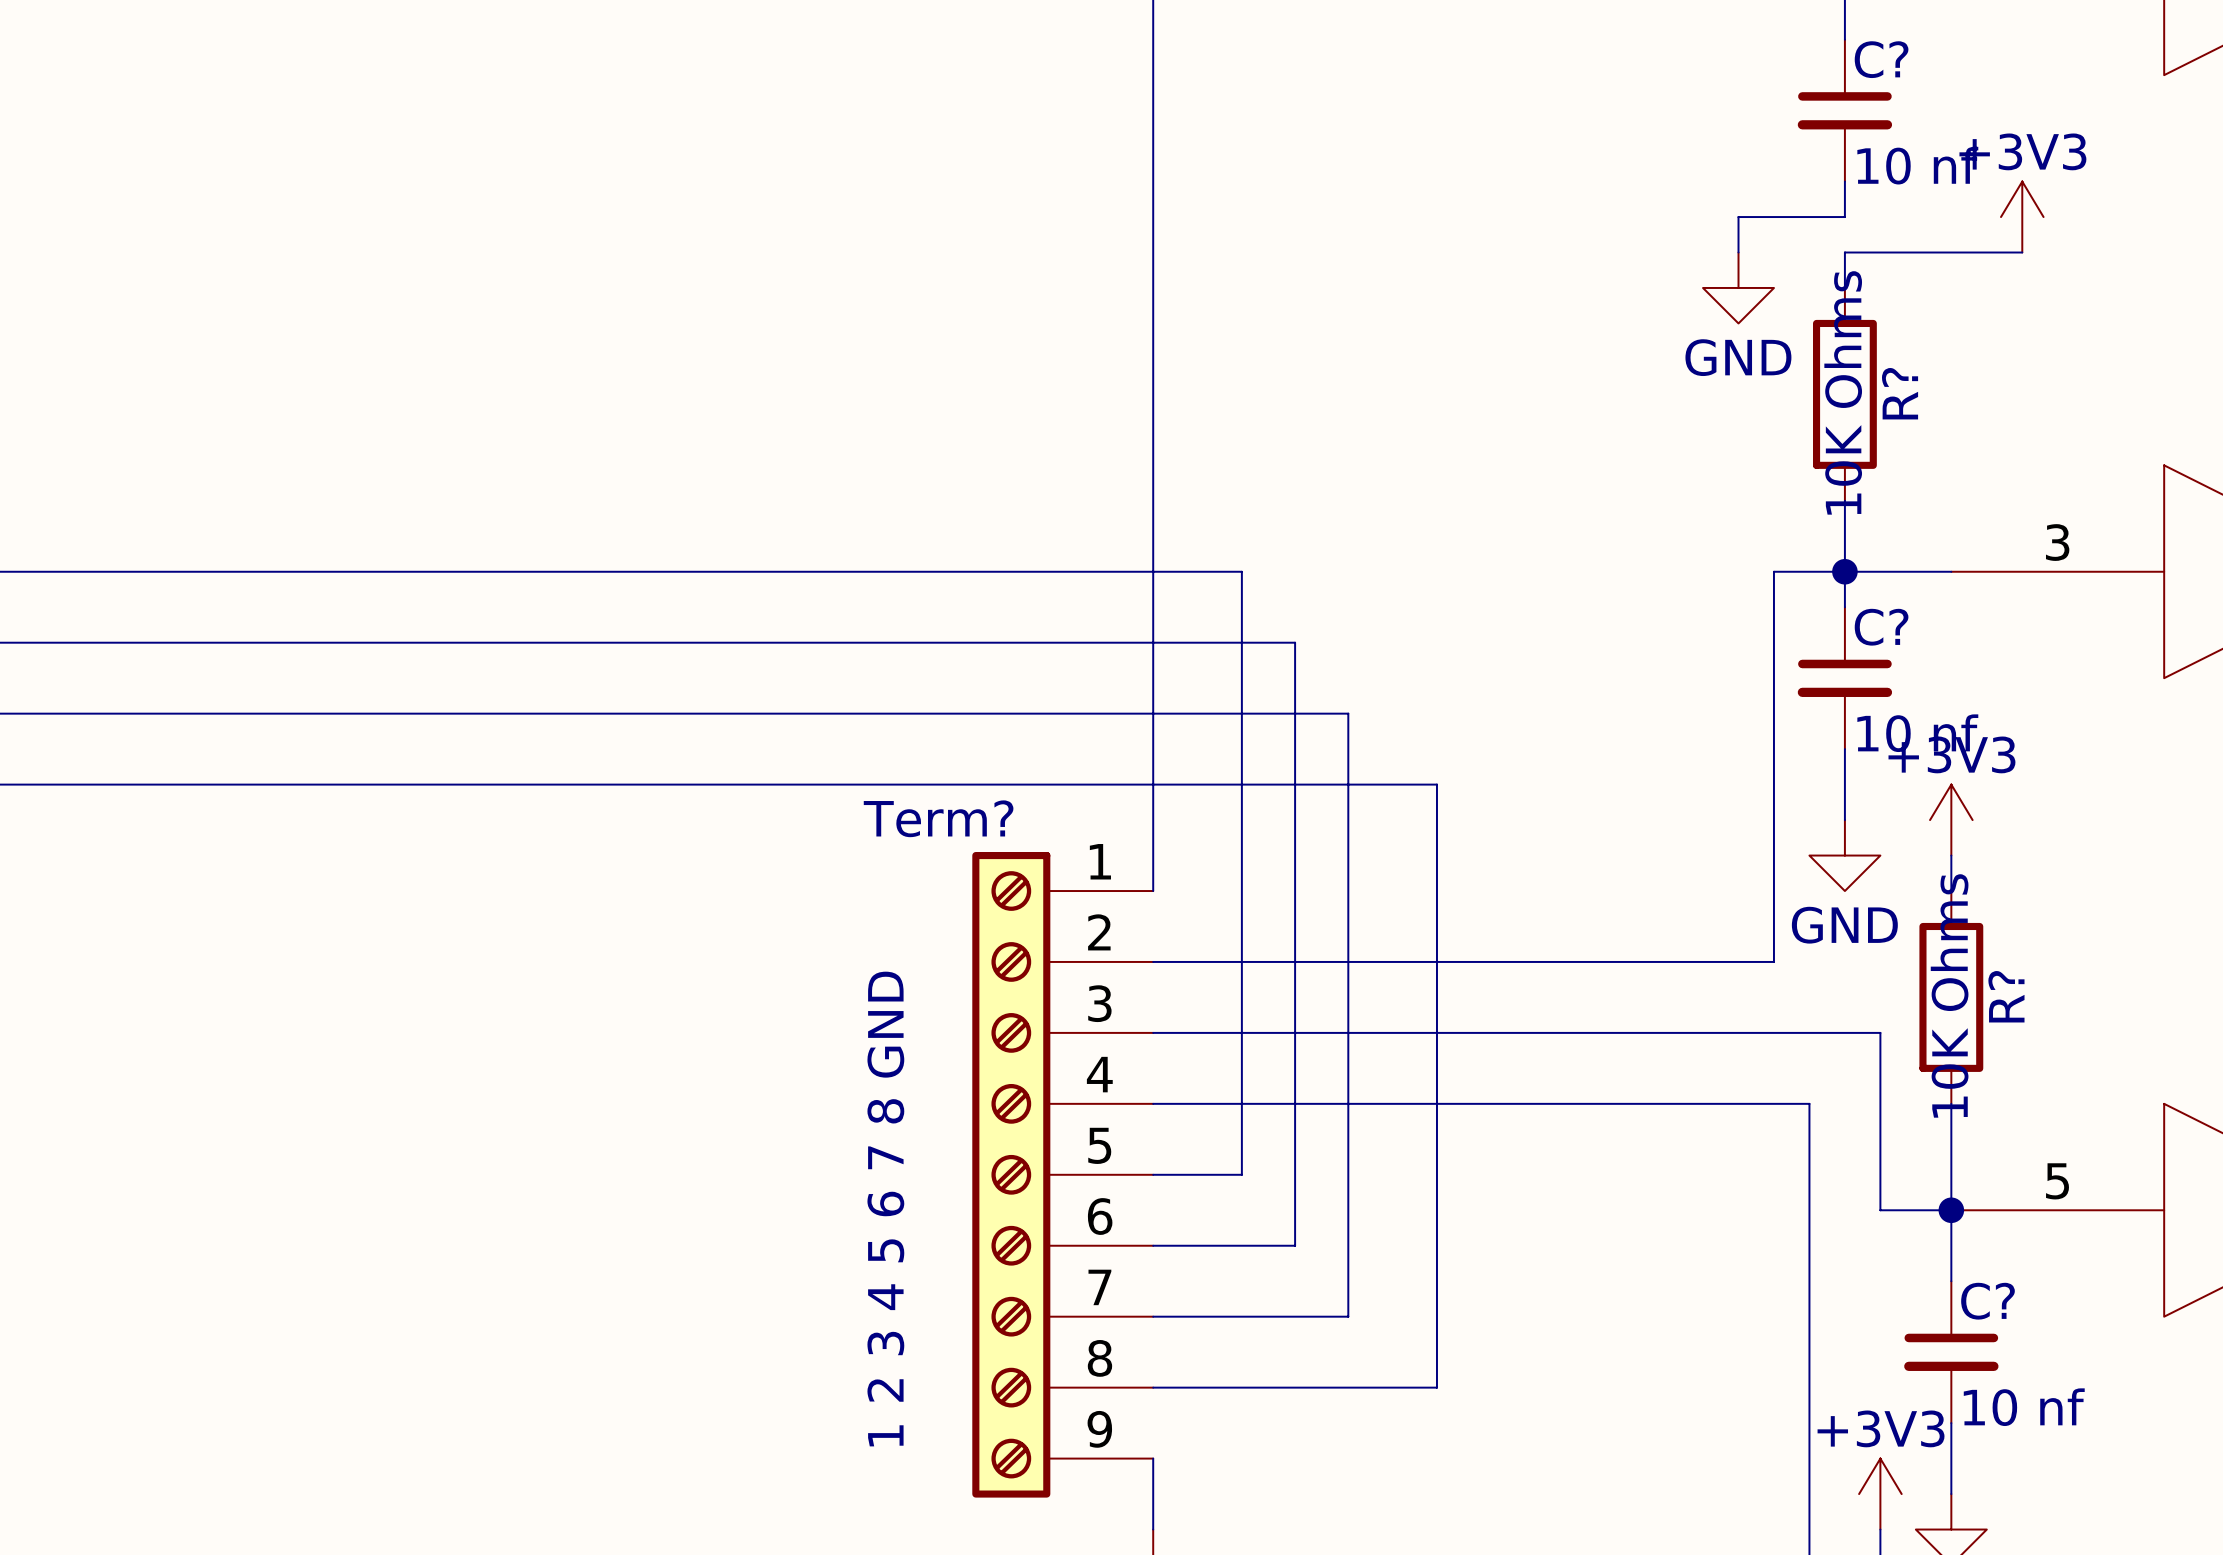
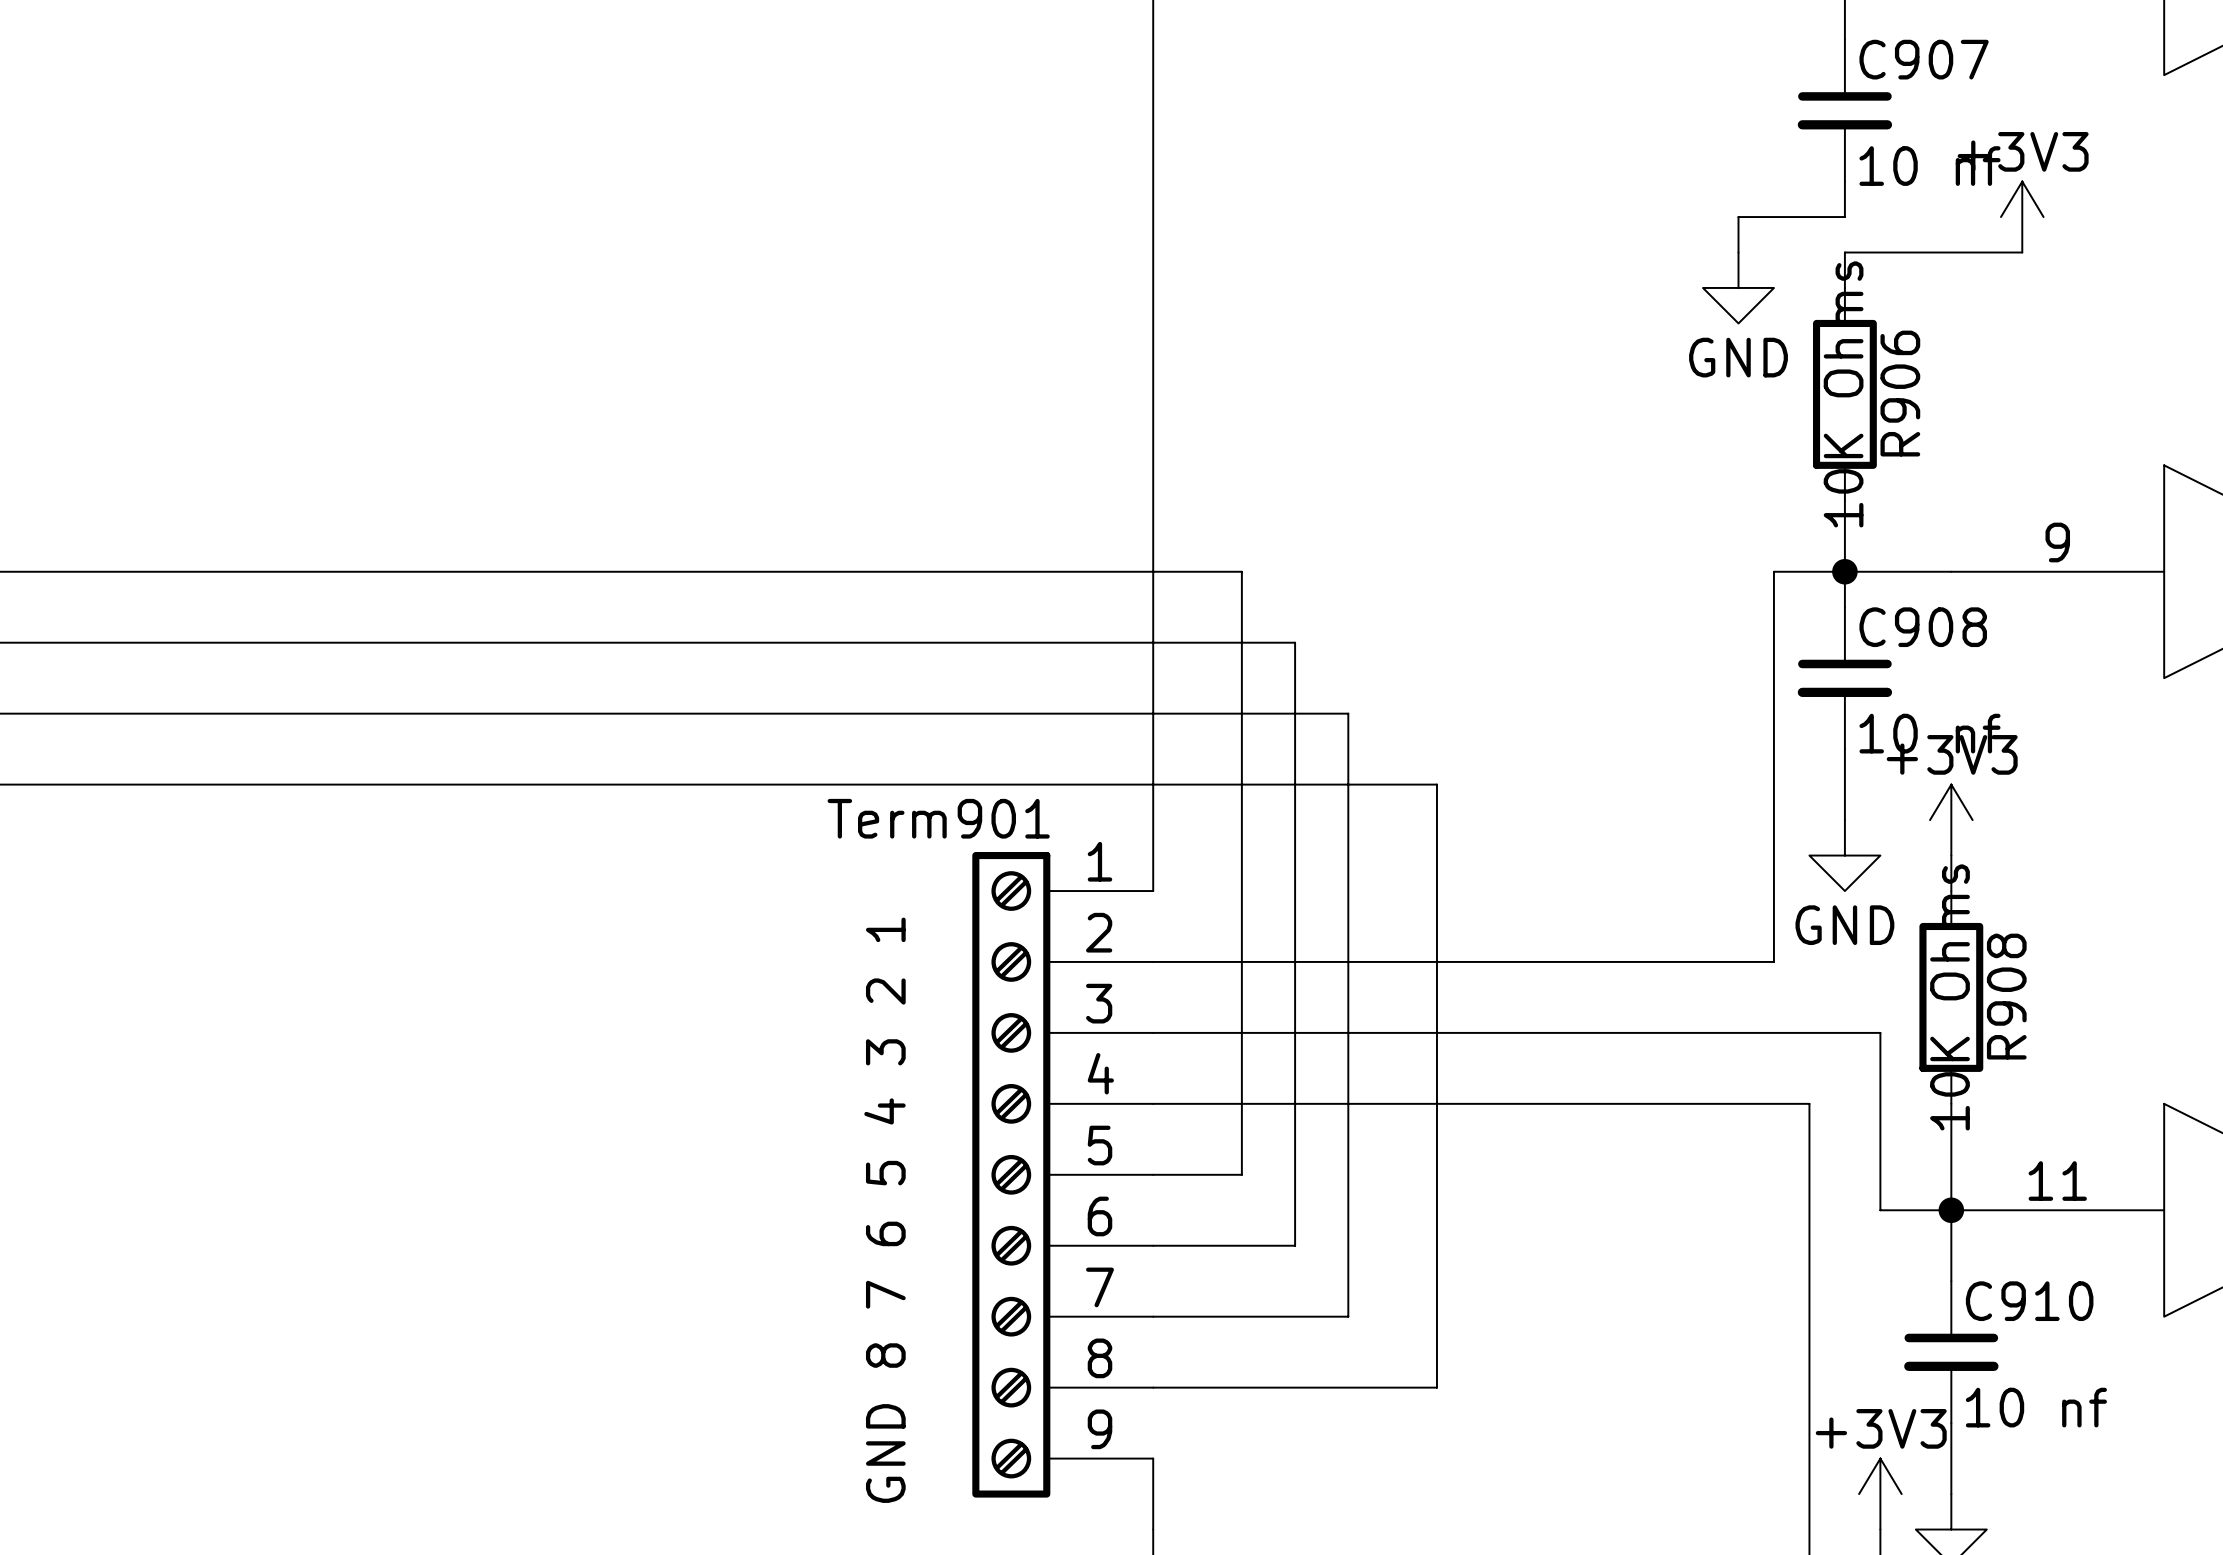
C? name: C? (1881, 59) -> C907 (1924, 59)
R? name: R? (1900, 393) -> R906 (1900, 393)
part pin number: 3 (2057, 542) -> 9 (2057, 542)
C? name: C? (1881, 627) -> C908 (1923, 627)
Term? name: Term? (938, 818) -> Term901 (938, 818)
R? name: R? (2006, 996) -> R908 (2006, 996)
part pin number: 5 (2057, 1181) -> 11 (2057, 1181)
Term? value: 1 2 3 4 5 6 7 8 GND (885, 1209) -> GND 8 7 6 5 4 3 2 1 (884, 1210)
C? name: C? (1988, 1301) -> C910 (2029, 1301)

